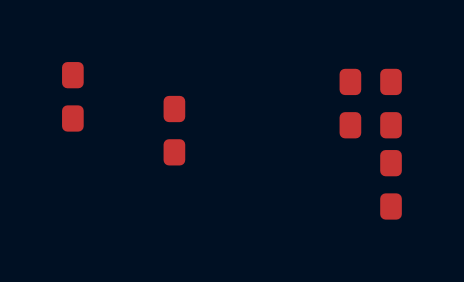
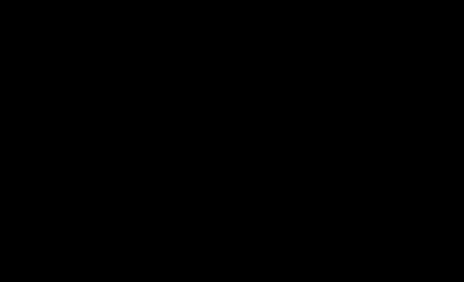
part: (72, 96) -> none
part: (350, 103) -> none
part: (391, 103) -> none
part: (174, 130) -> none
part: (391, 184) -> none

